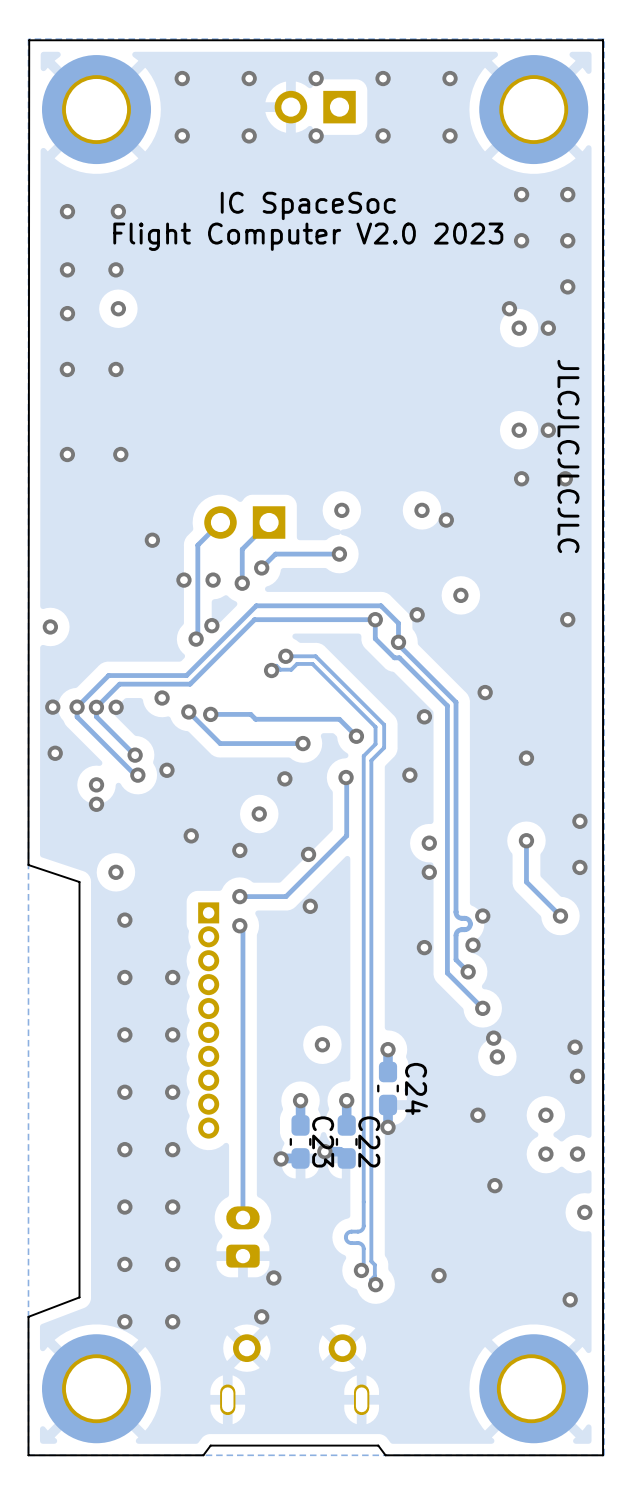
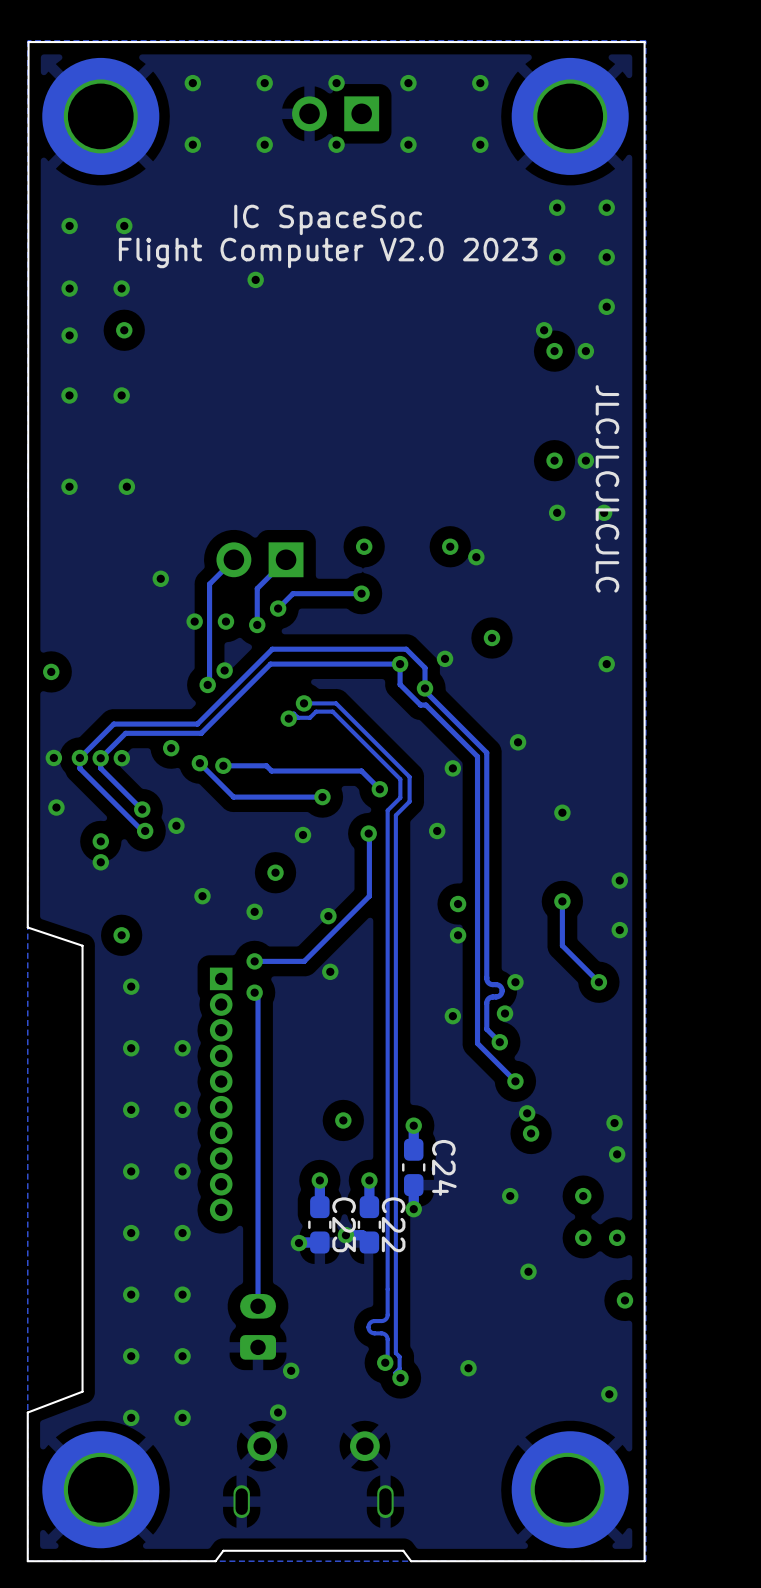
via: none -> (255, 279)

